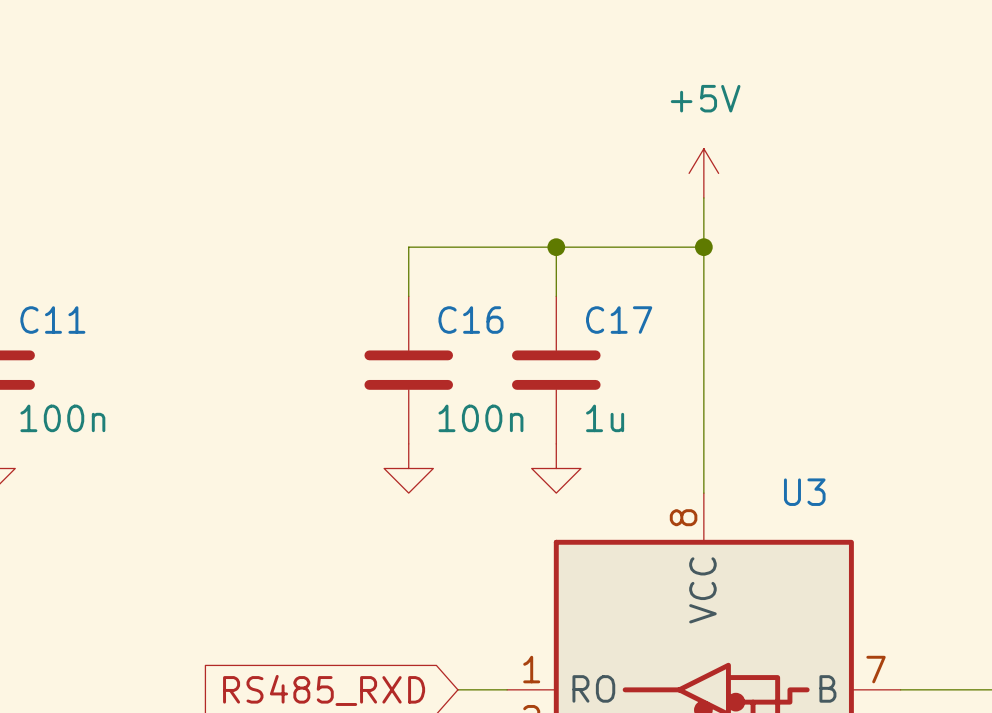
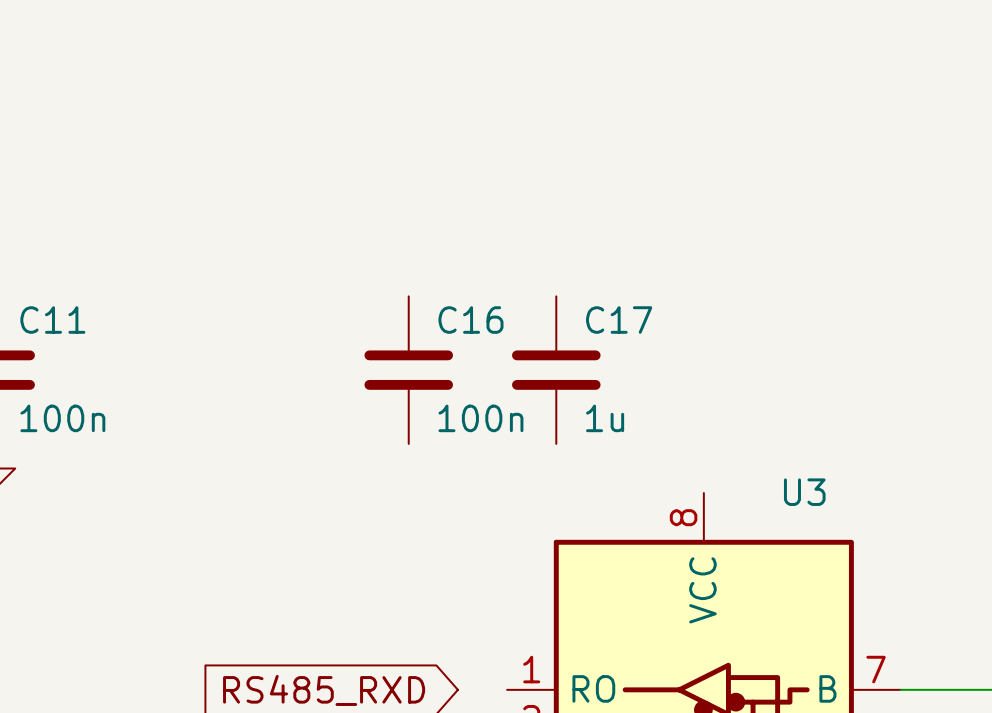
power symbol: +5V (703, 173) -> none
wire: (703, 197) (703, 493) -> none
wire: (556, 247) (556, 296) -> none
junction: (556, 247) -> none
wire: (703, 247) (408, 247) (408, 296) -> none
junction: (703, 247) -> none
power symbol: (408, 468) -> none
power symbol: (556, 468) -> none
wire: (457, 689) (507, 689) -> none

